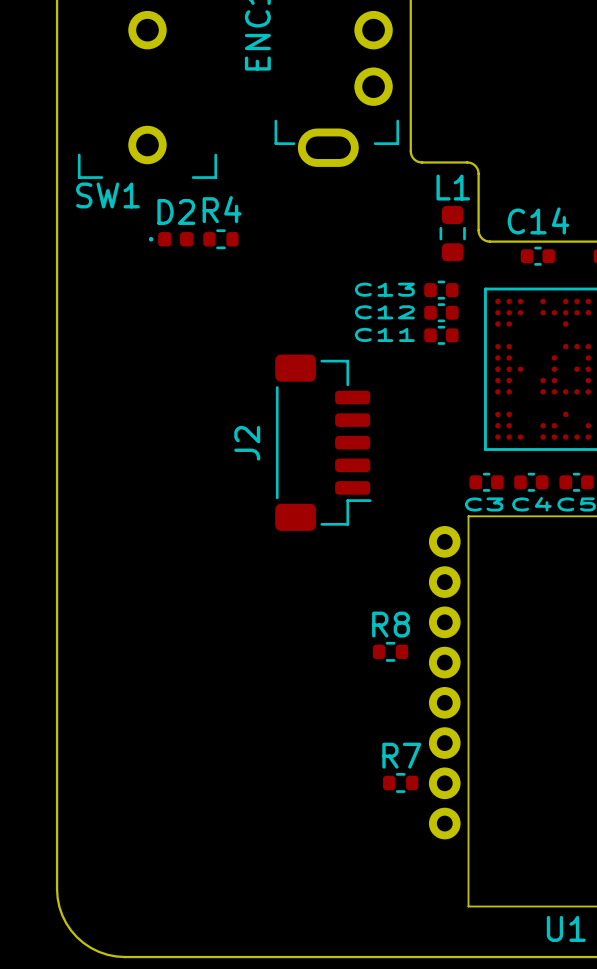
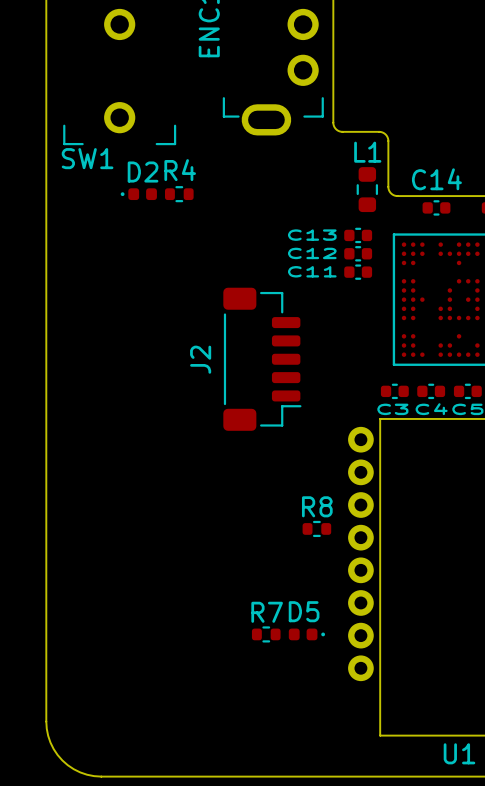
D5: none -> (306, 634)
R7 position: (400, 782) -> (266, 634)

